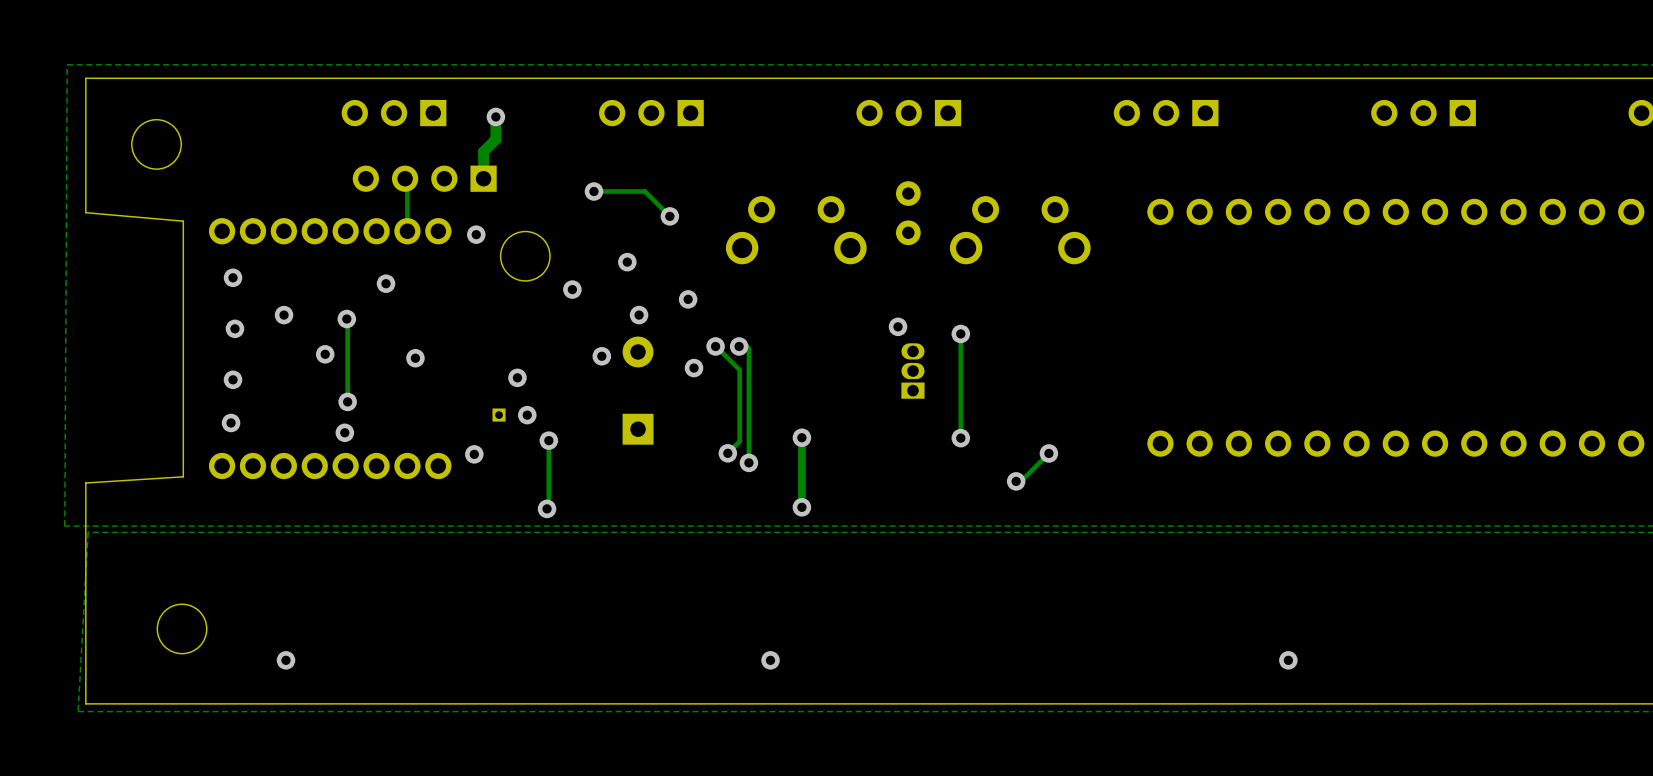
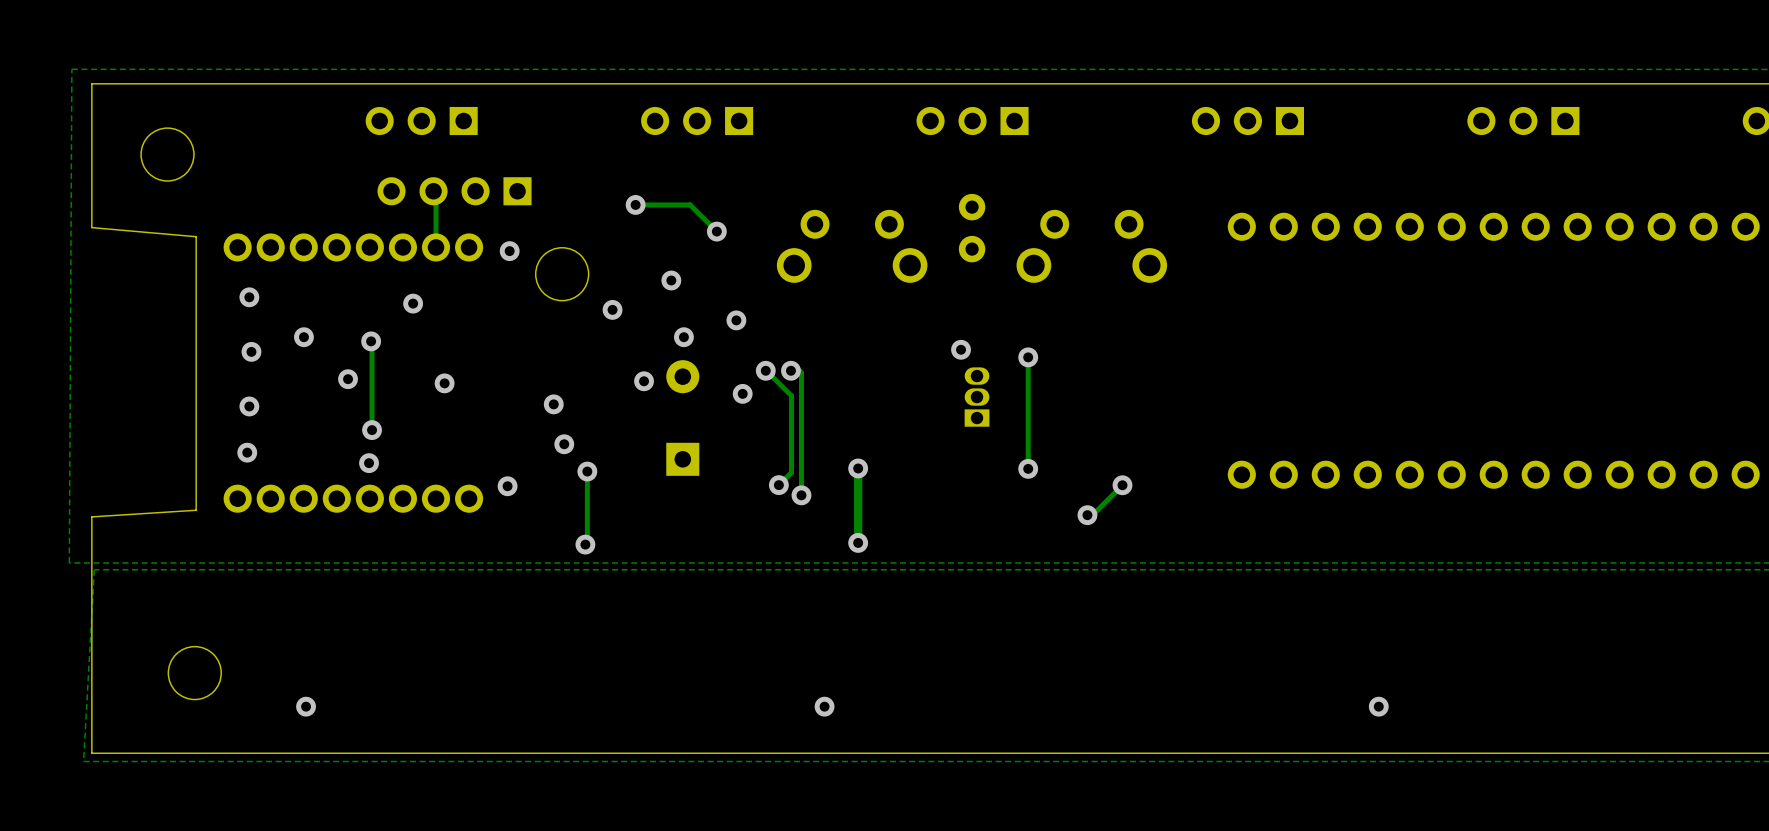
track: (495, 116) (495, 139) (483, 151) (483, 178) -> none
via: (495, 116) -> none
part: (499, 415) -> none

